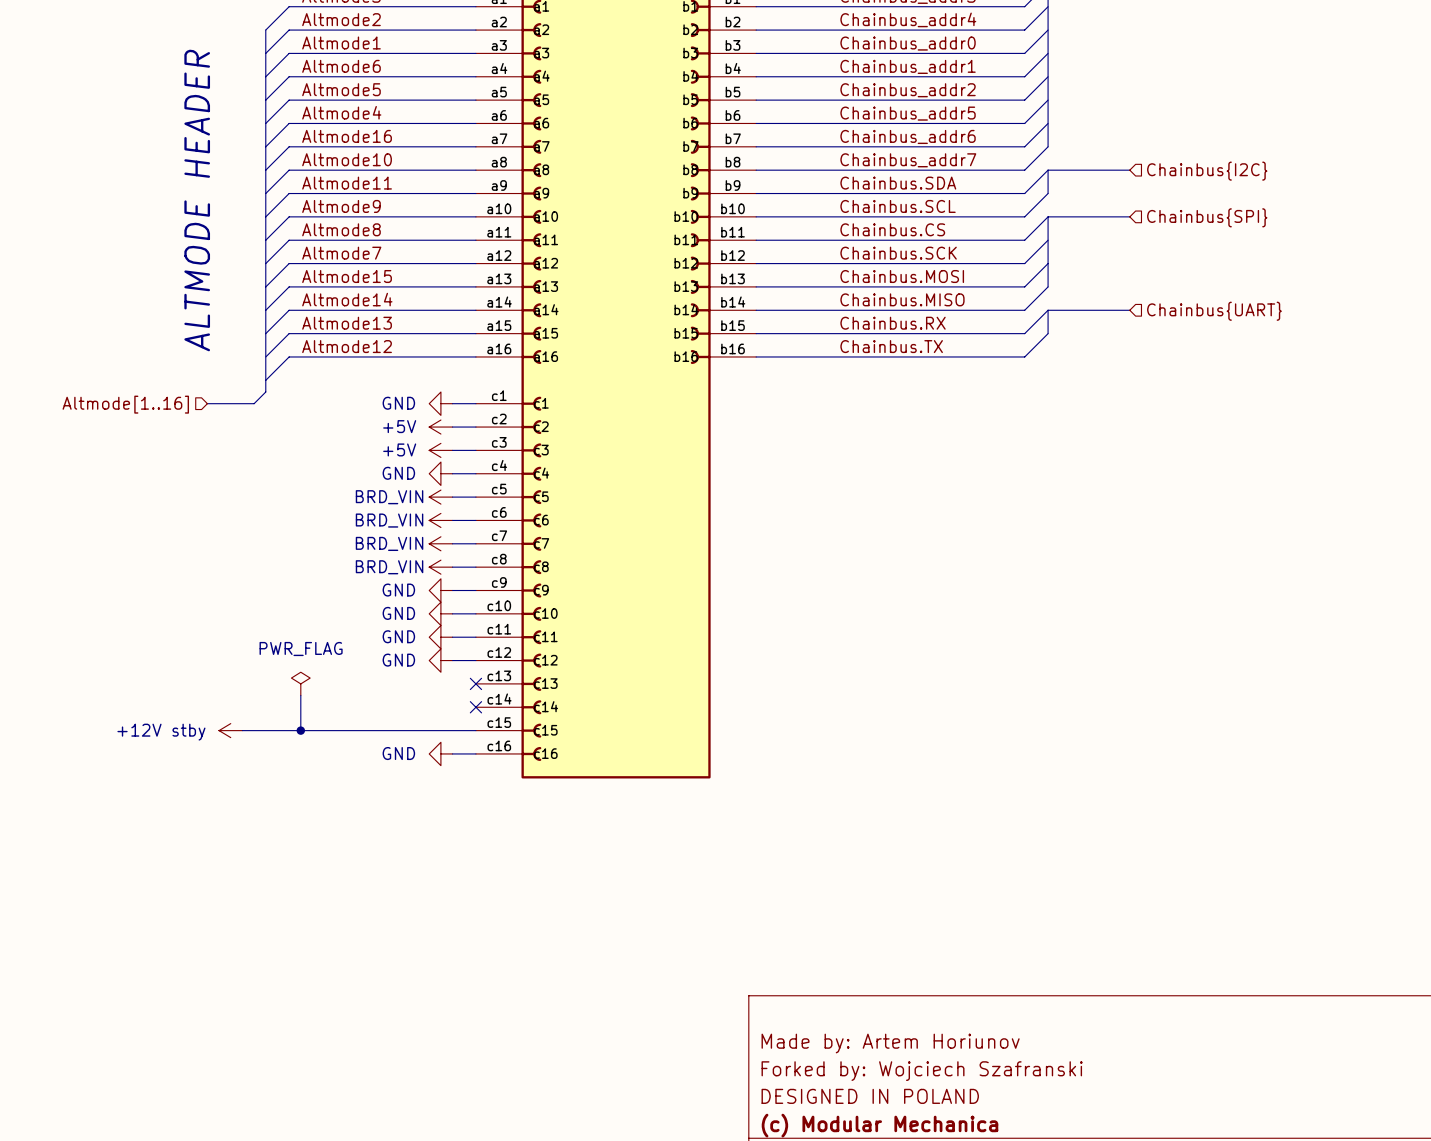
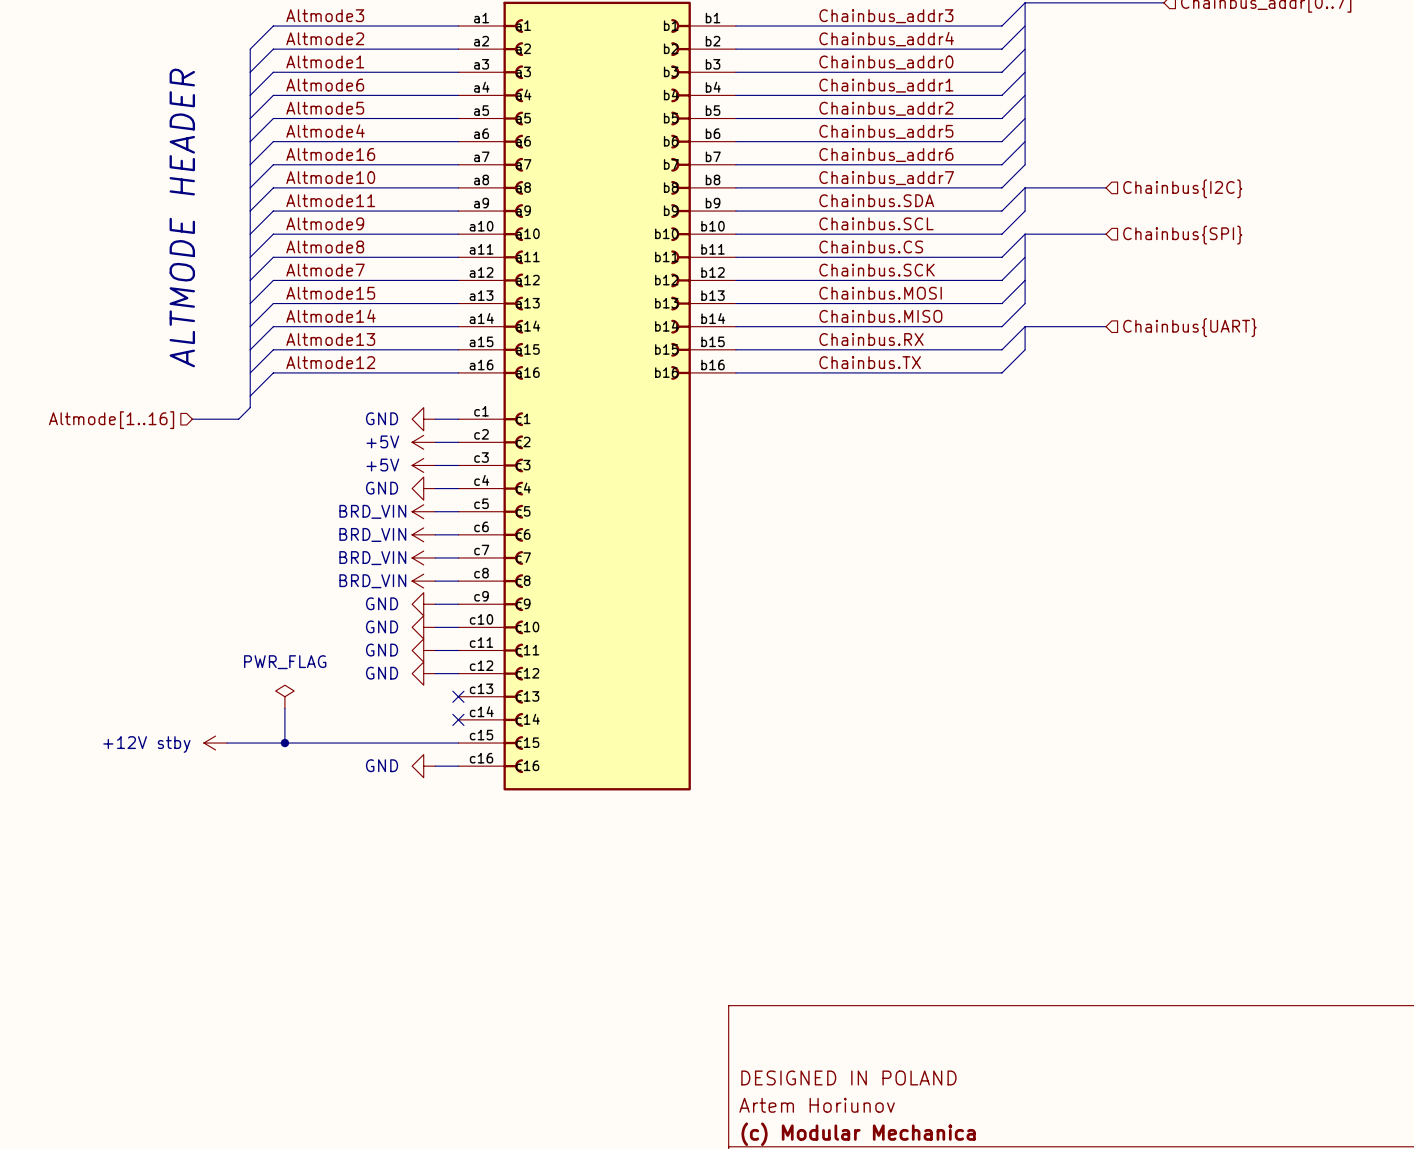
title block: Made by: Artem Horiunov (890, 1043) -> none
title block: Forked by: Wojciech Szafranski (922, 1071) -> DESIGNED IN POLAND (848, 1077)
title block: DESIGNED IN POLAND (870, 1096) -> Artem Horiunov (817, 1105)

